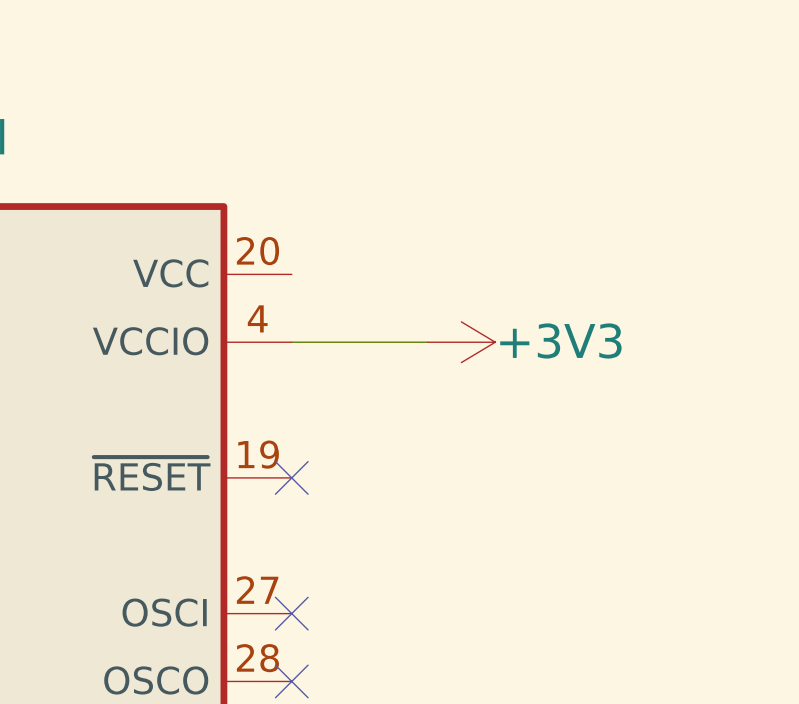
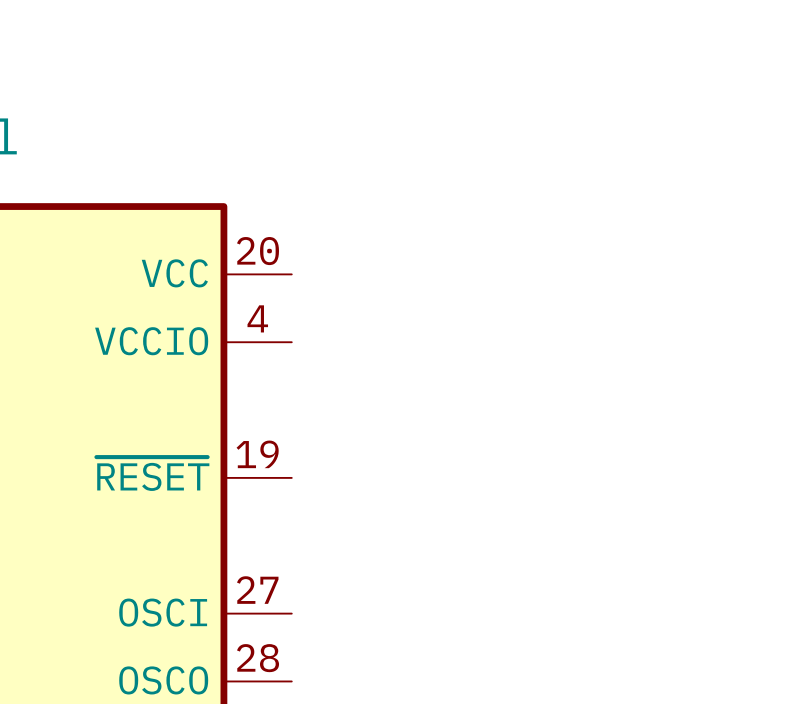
wire: (291, 342) (427, 342) -> none
power symbol: +3V3 (461, 342) -> none
no-connect mark: (291, 477) -> none
no-connect mark: (291, 613) -> none
no-connect mark: (291, 681) -> none

